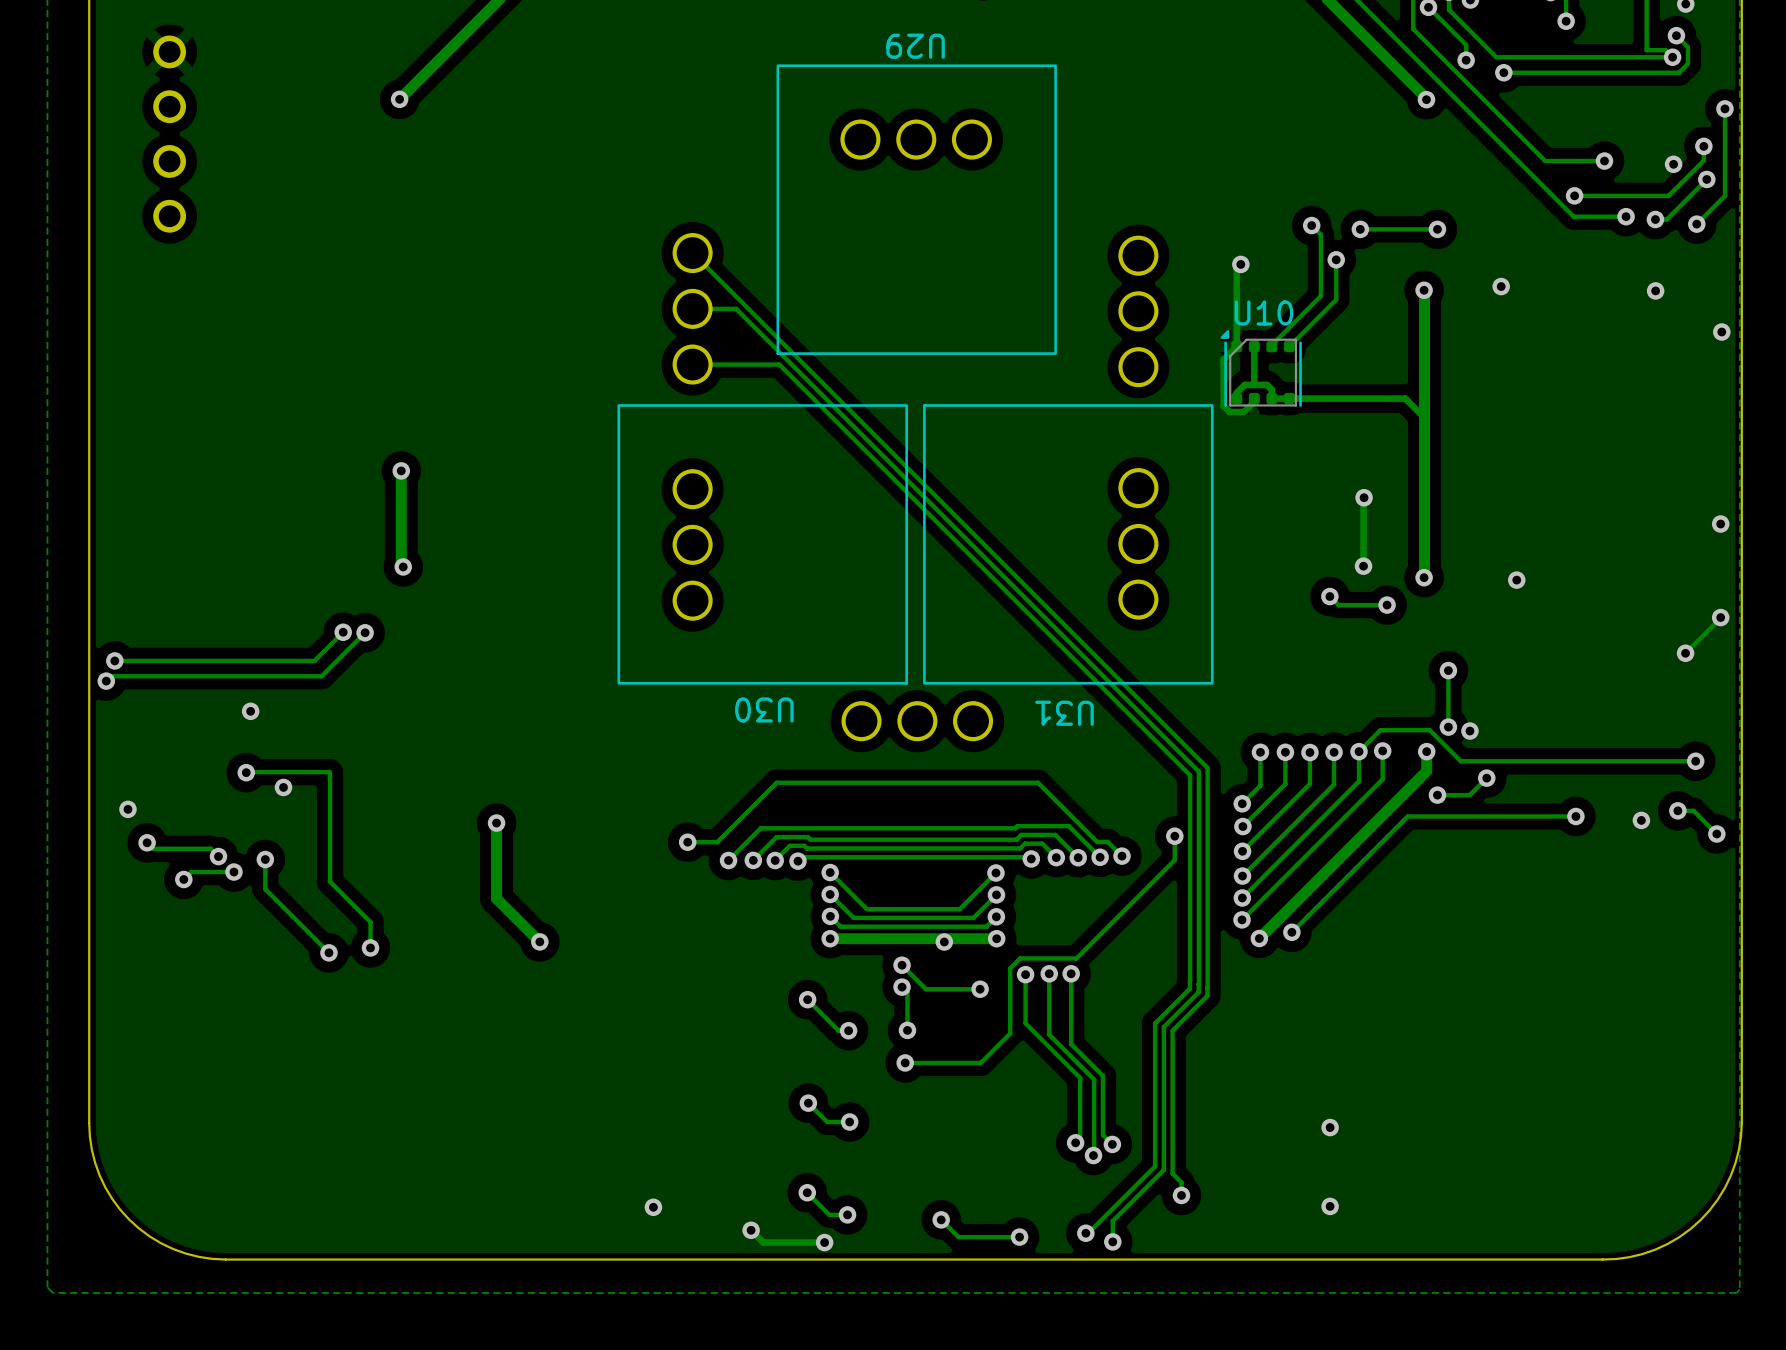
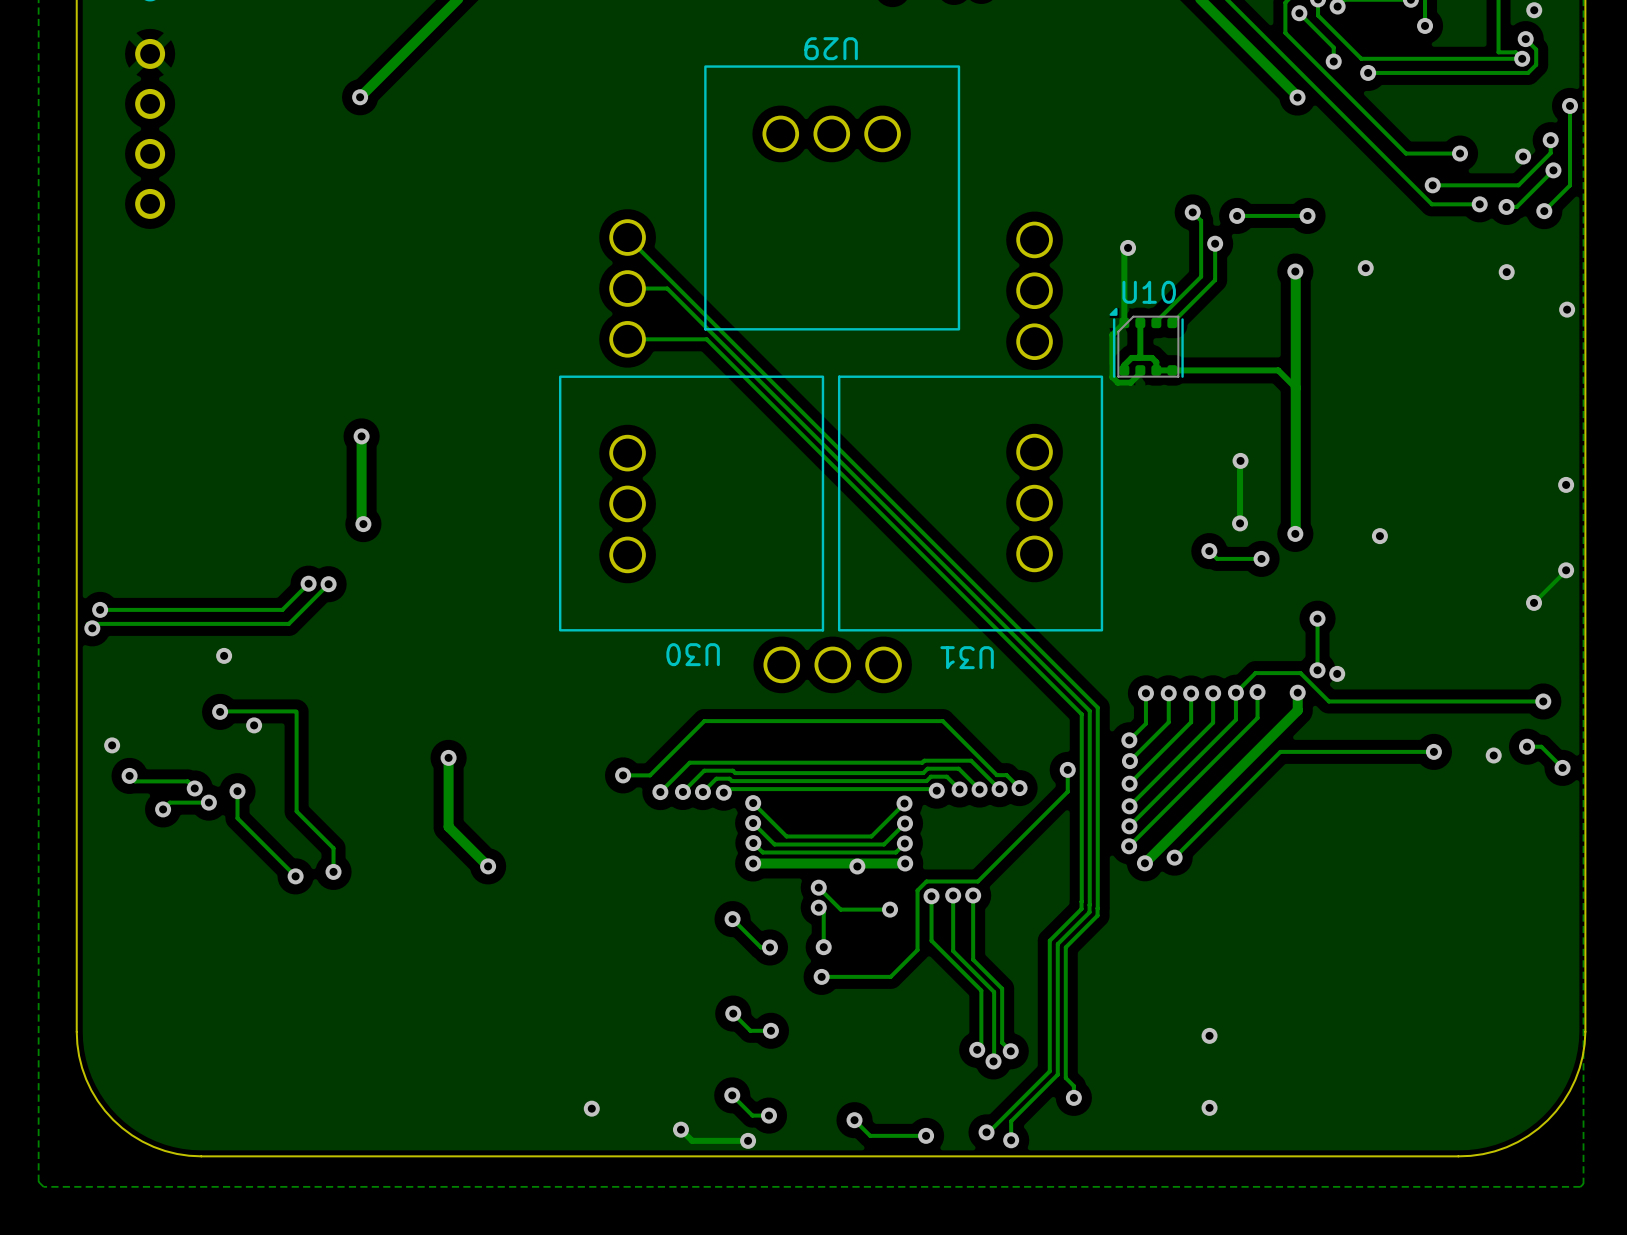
track: (1486, 778) (1469, 795) (1437, 795) -> none
via: (1486, 778) -> none
via: (1437, 795) -> none

